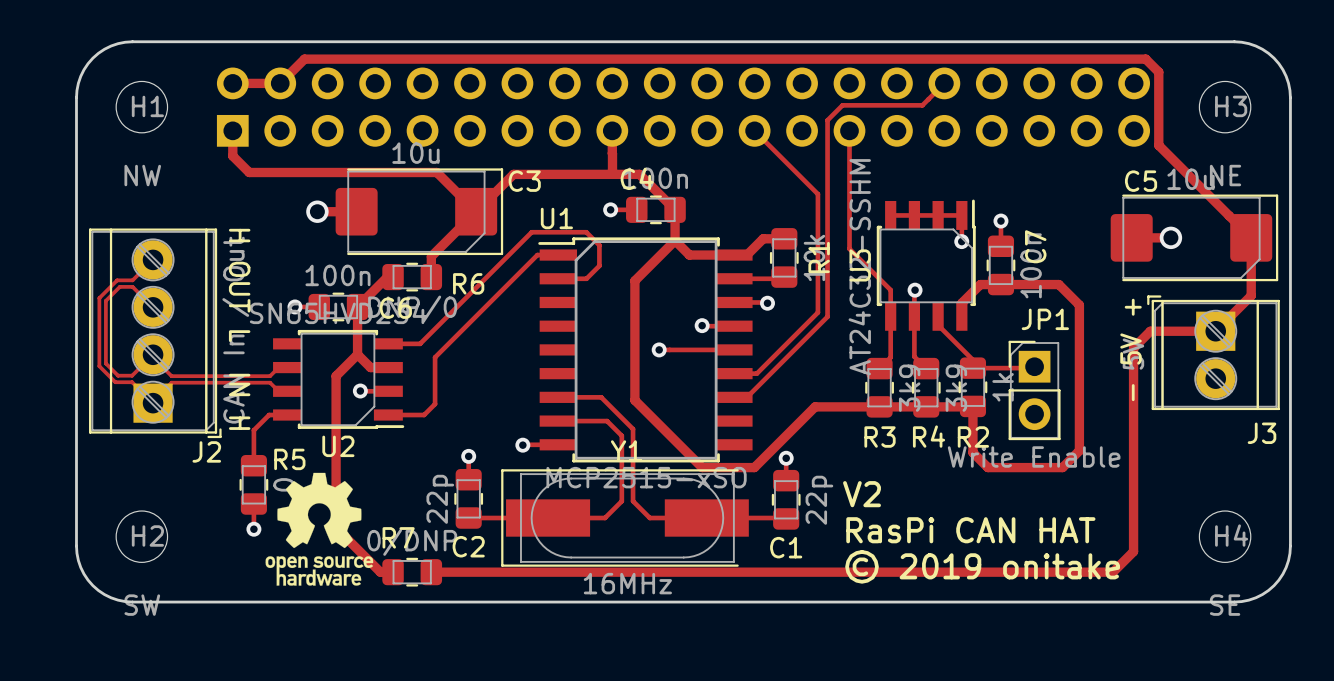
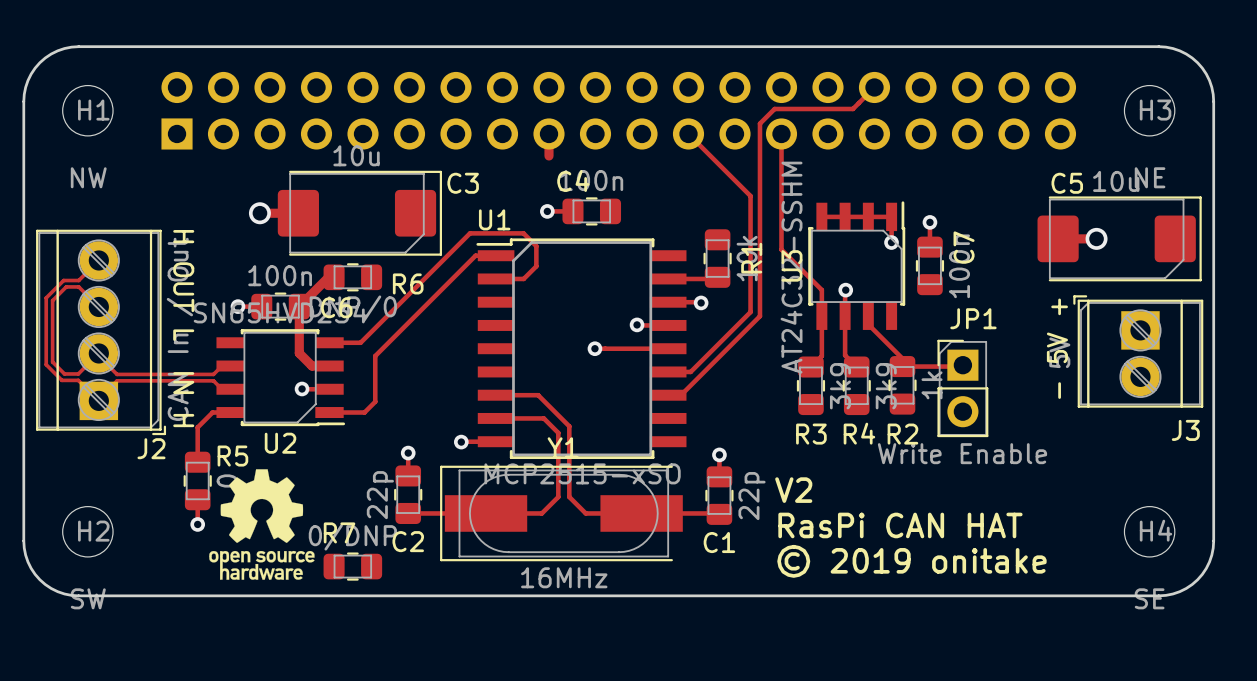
track: (232, 83) (280, 83) (304, 59) (1145, 59) (1158, 72) (1158, 145) (1251, 237) (1251, 295) (1215, 331) (1150, 331) (1133, 348) (1133, 551) (1113, 572) (431, 572) -> none
track: (232, 130) (232, 156) (249, 172) (436, 172) (476, 211) -> none
track: (612, 153) (612, 174) -> none
track: (784, 238) (763, 238) (746, 255) (689, 255) (675, 240) -> none
track: (675, 240) (675, 209) (639, 174) (513, 174) (431, 256) (431, 277) -> none
track: (675, 240) (634, 280) (634, 400) (702, 467) (754, 467) (815, 406) (972, 406) (972, 452) (987, 467) (1062, 467) (1079, 450) (1079, 305) (1058, 284) (980, 284) (961, 303) (961, 316) -> none
track: (357, 354) (336, 376) (336, 527) (380, 572) (393, 572) -> none

